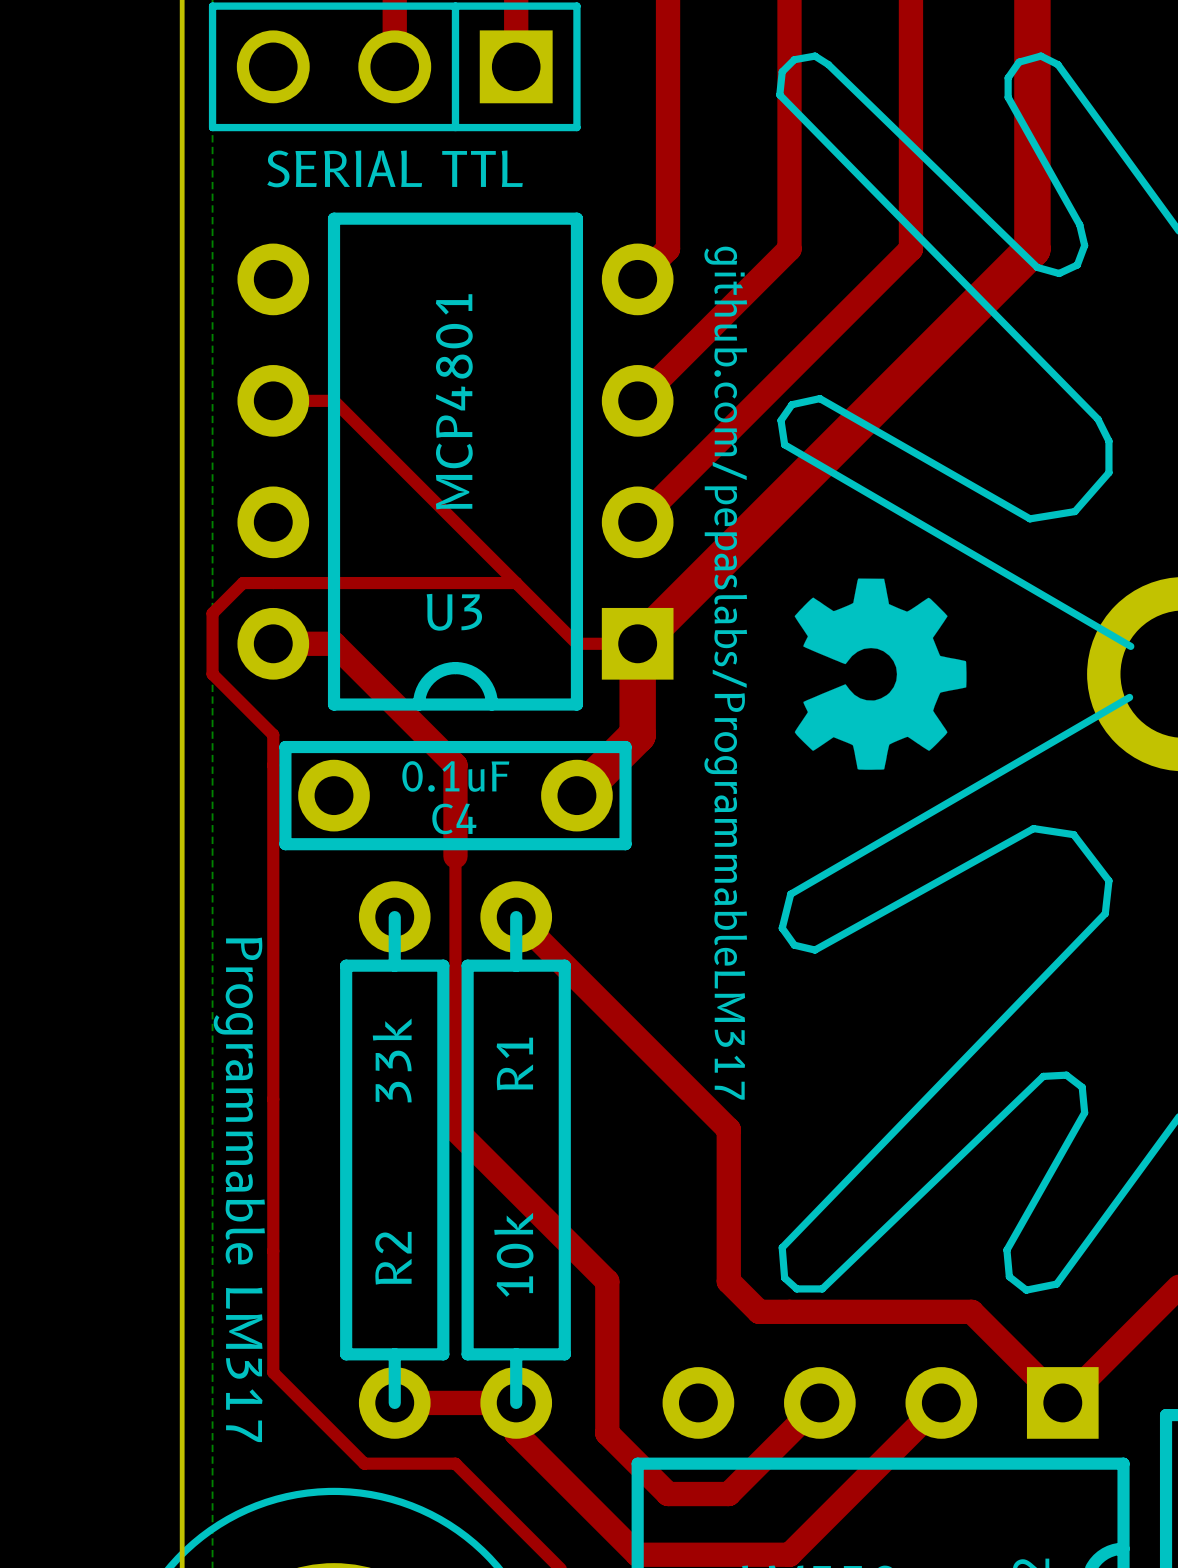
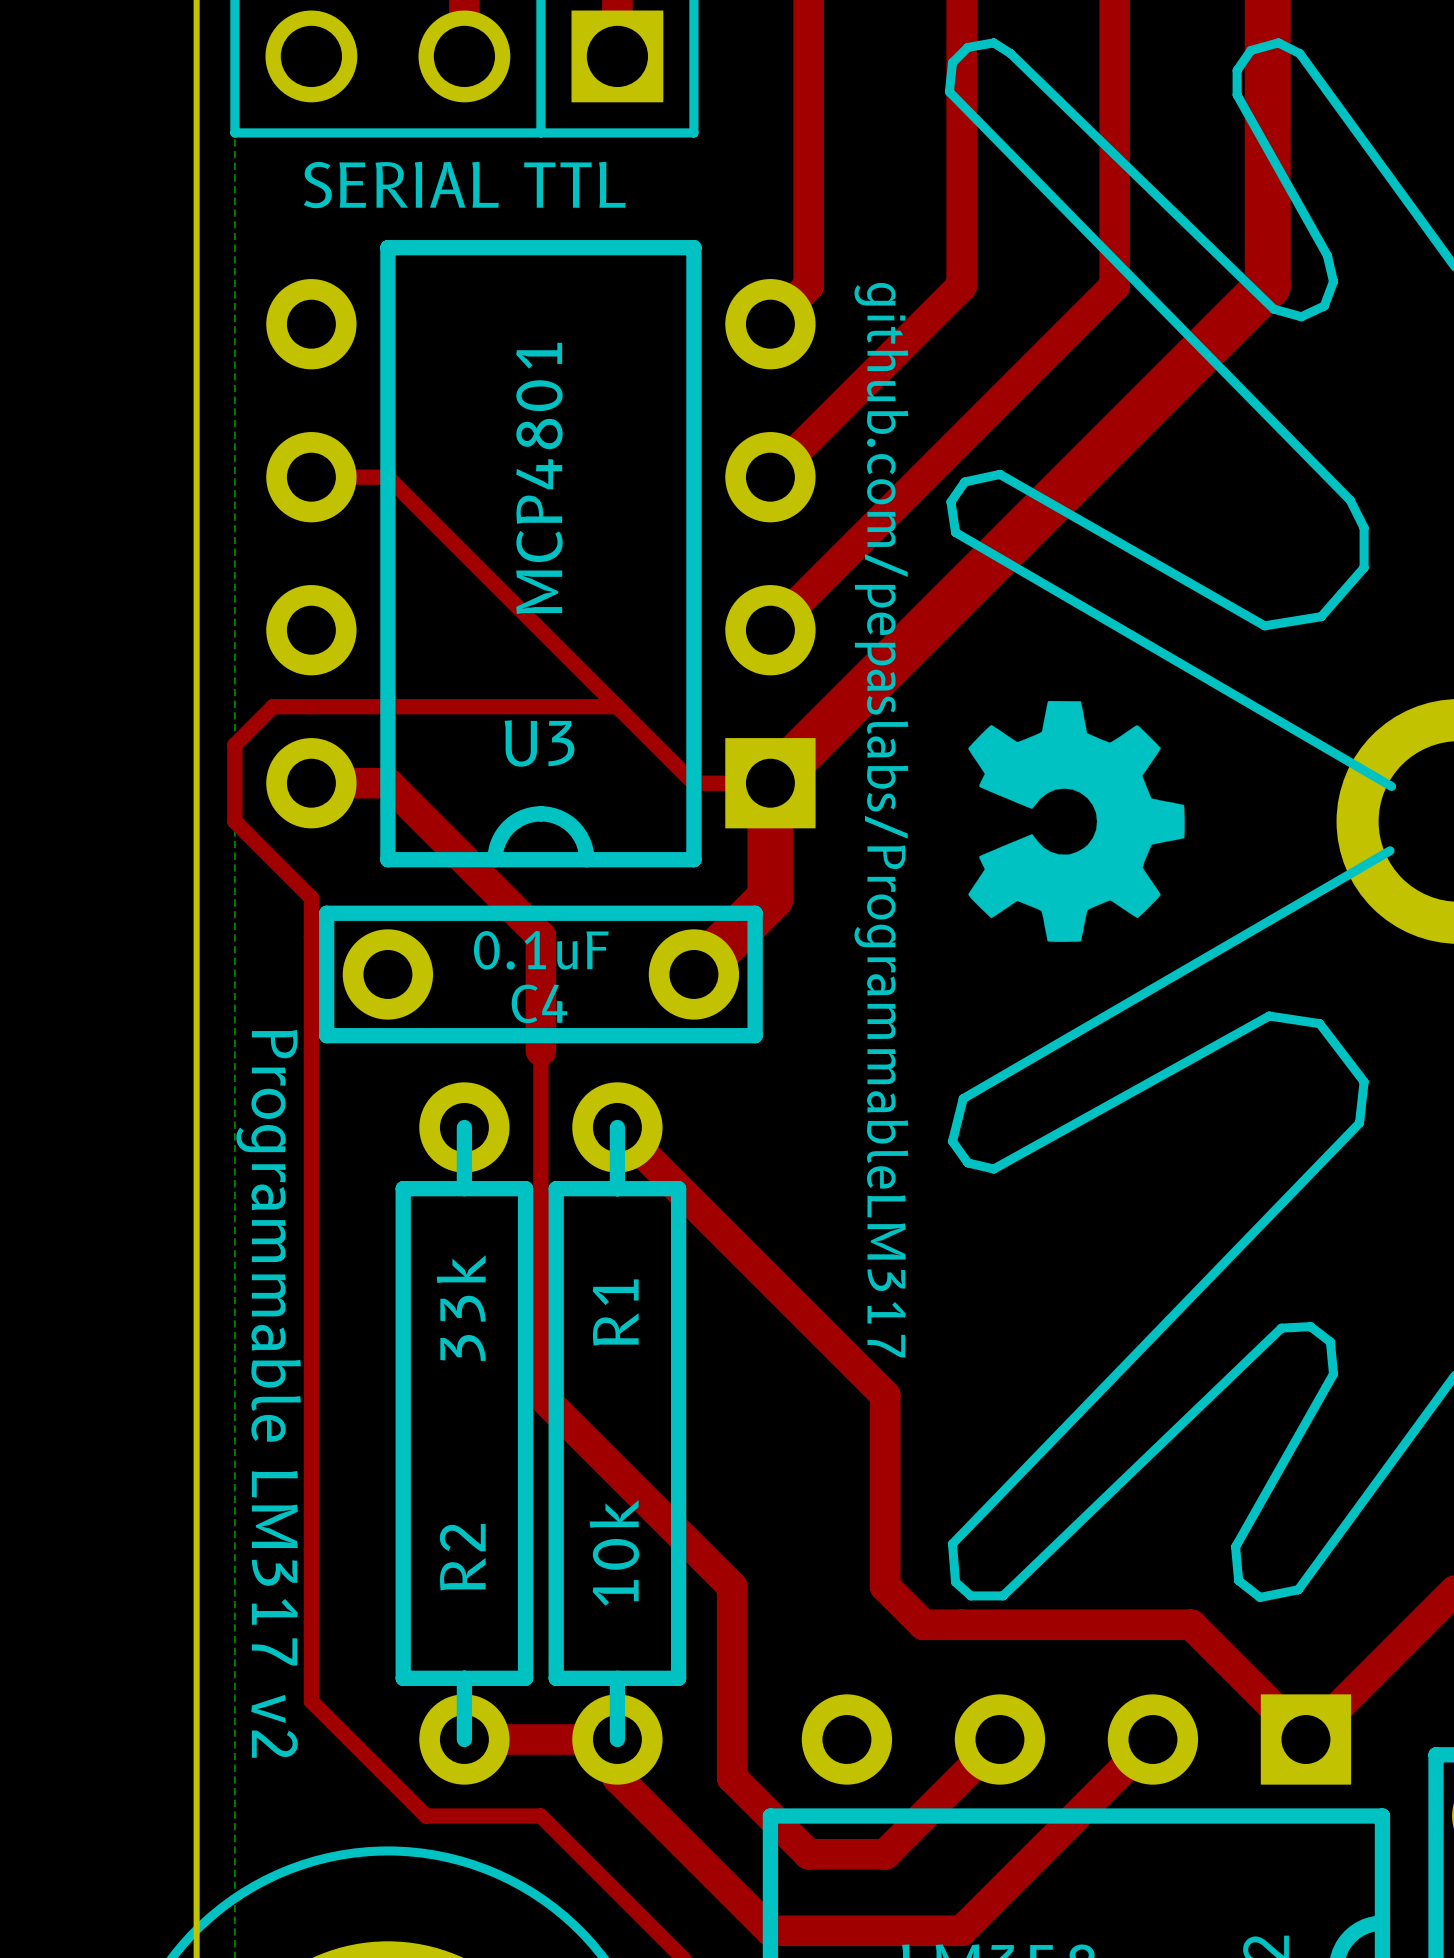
text: Programmable LM317 (239, 1189) -> Programmable LM317 v2 (268, 1393)

